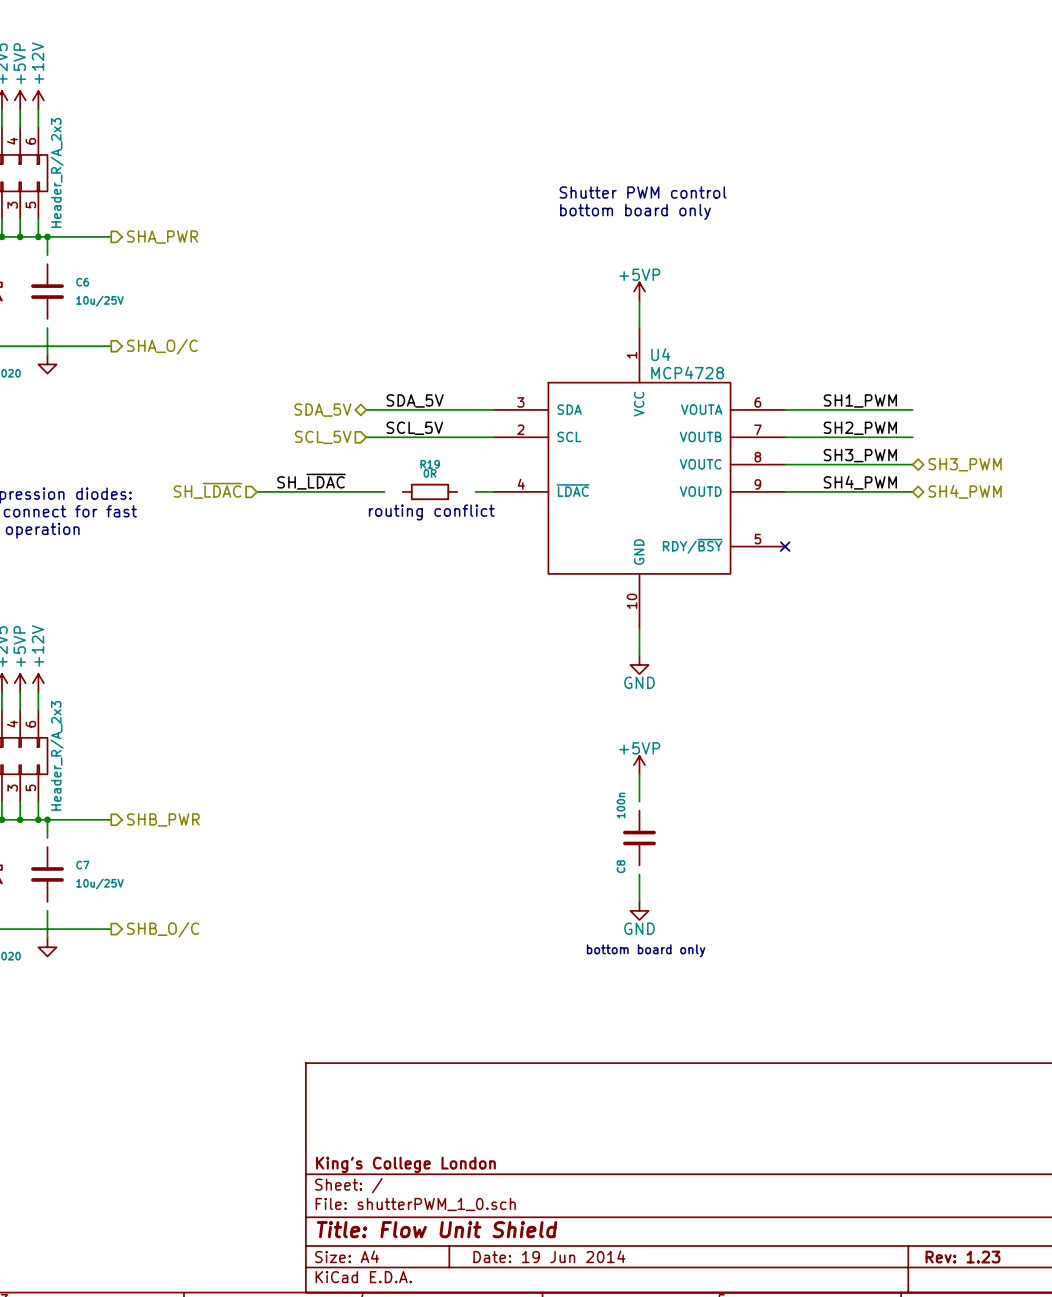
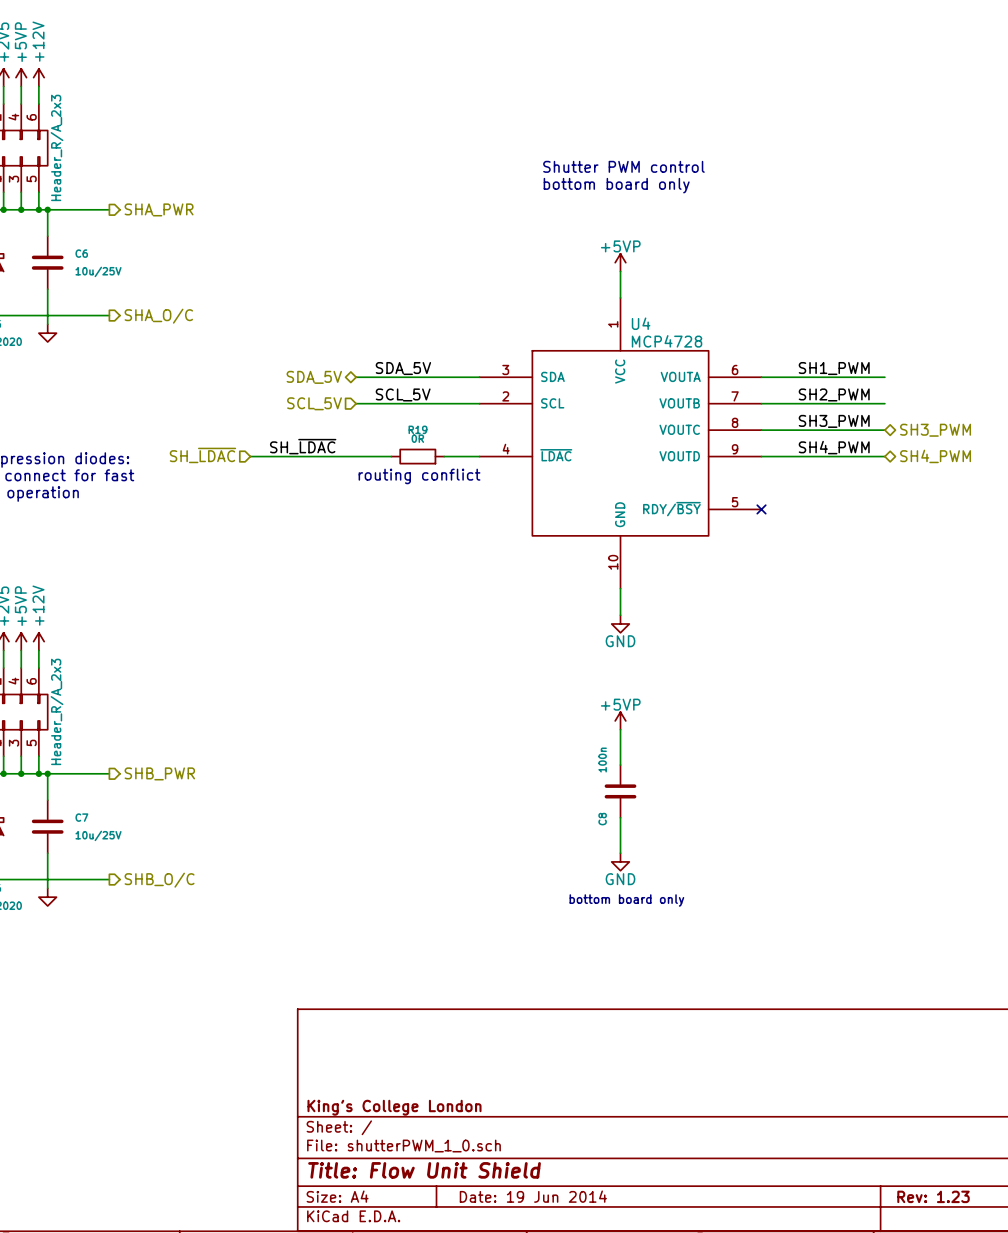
wire: none -> (47, 227) (47, 236)
wire: none -> (47, 289) (47, 297)
wire: none -> (373, 456) (391, 456)
wire: none -> (444, 456) (461, 456)
wire: none -> (620, 756) (620, 764)
wire: none -> (47, 791) (47, 800)
wire: none -> (620, 817) (620, 826)
wire: none -> (47, 853) (47, 861)

